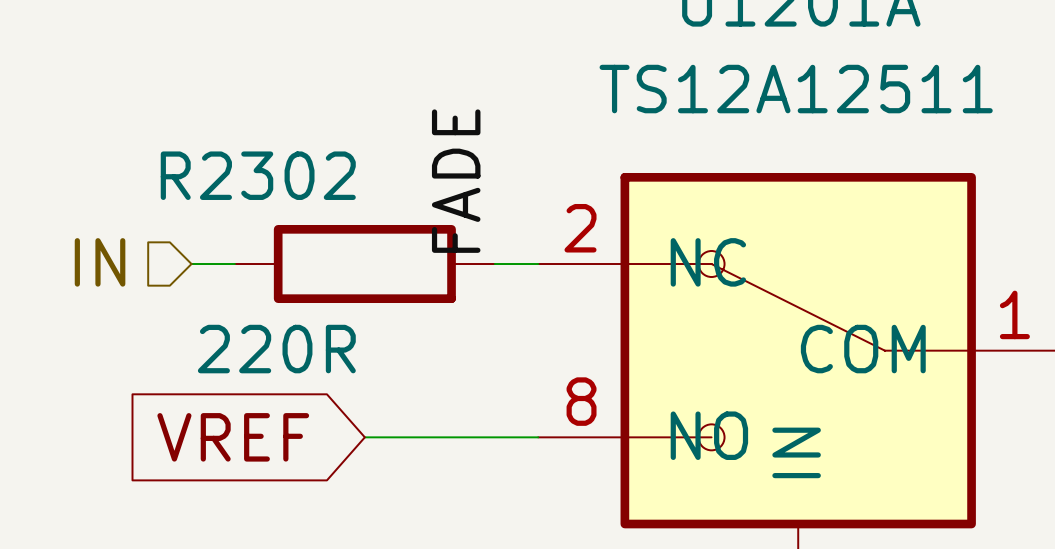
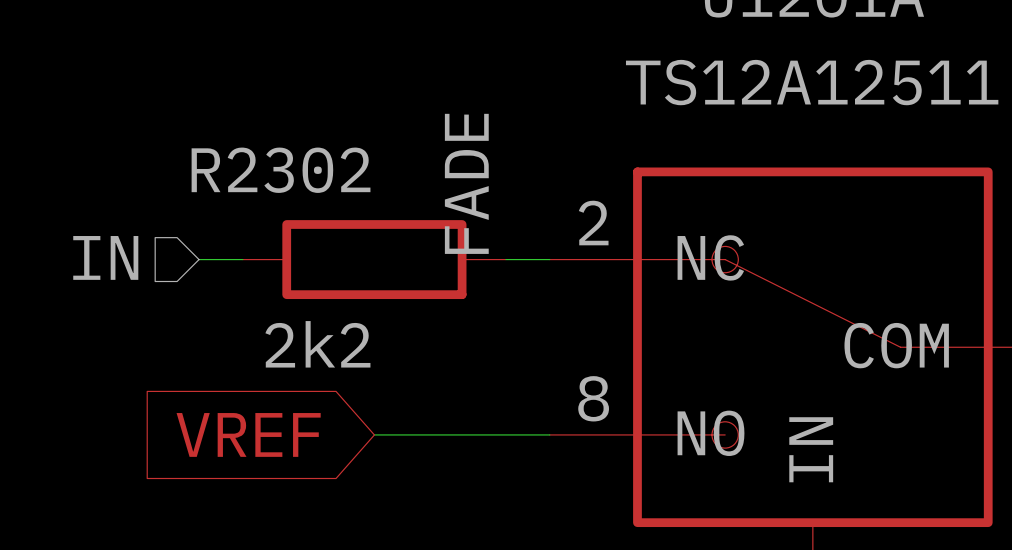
R2302 value: 220R (276, 349) -> 2k2 (317, 344)

